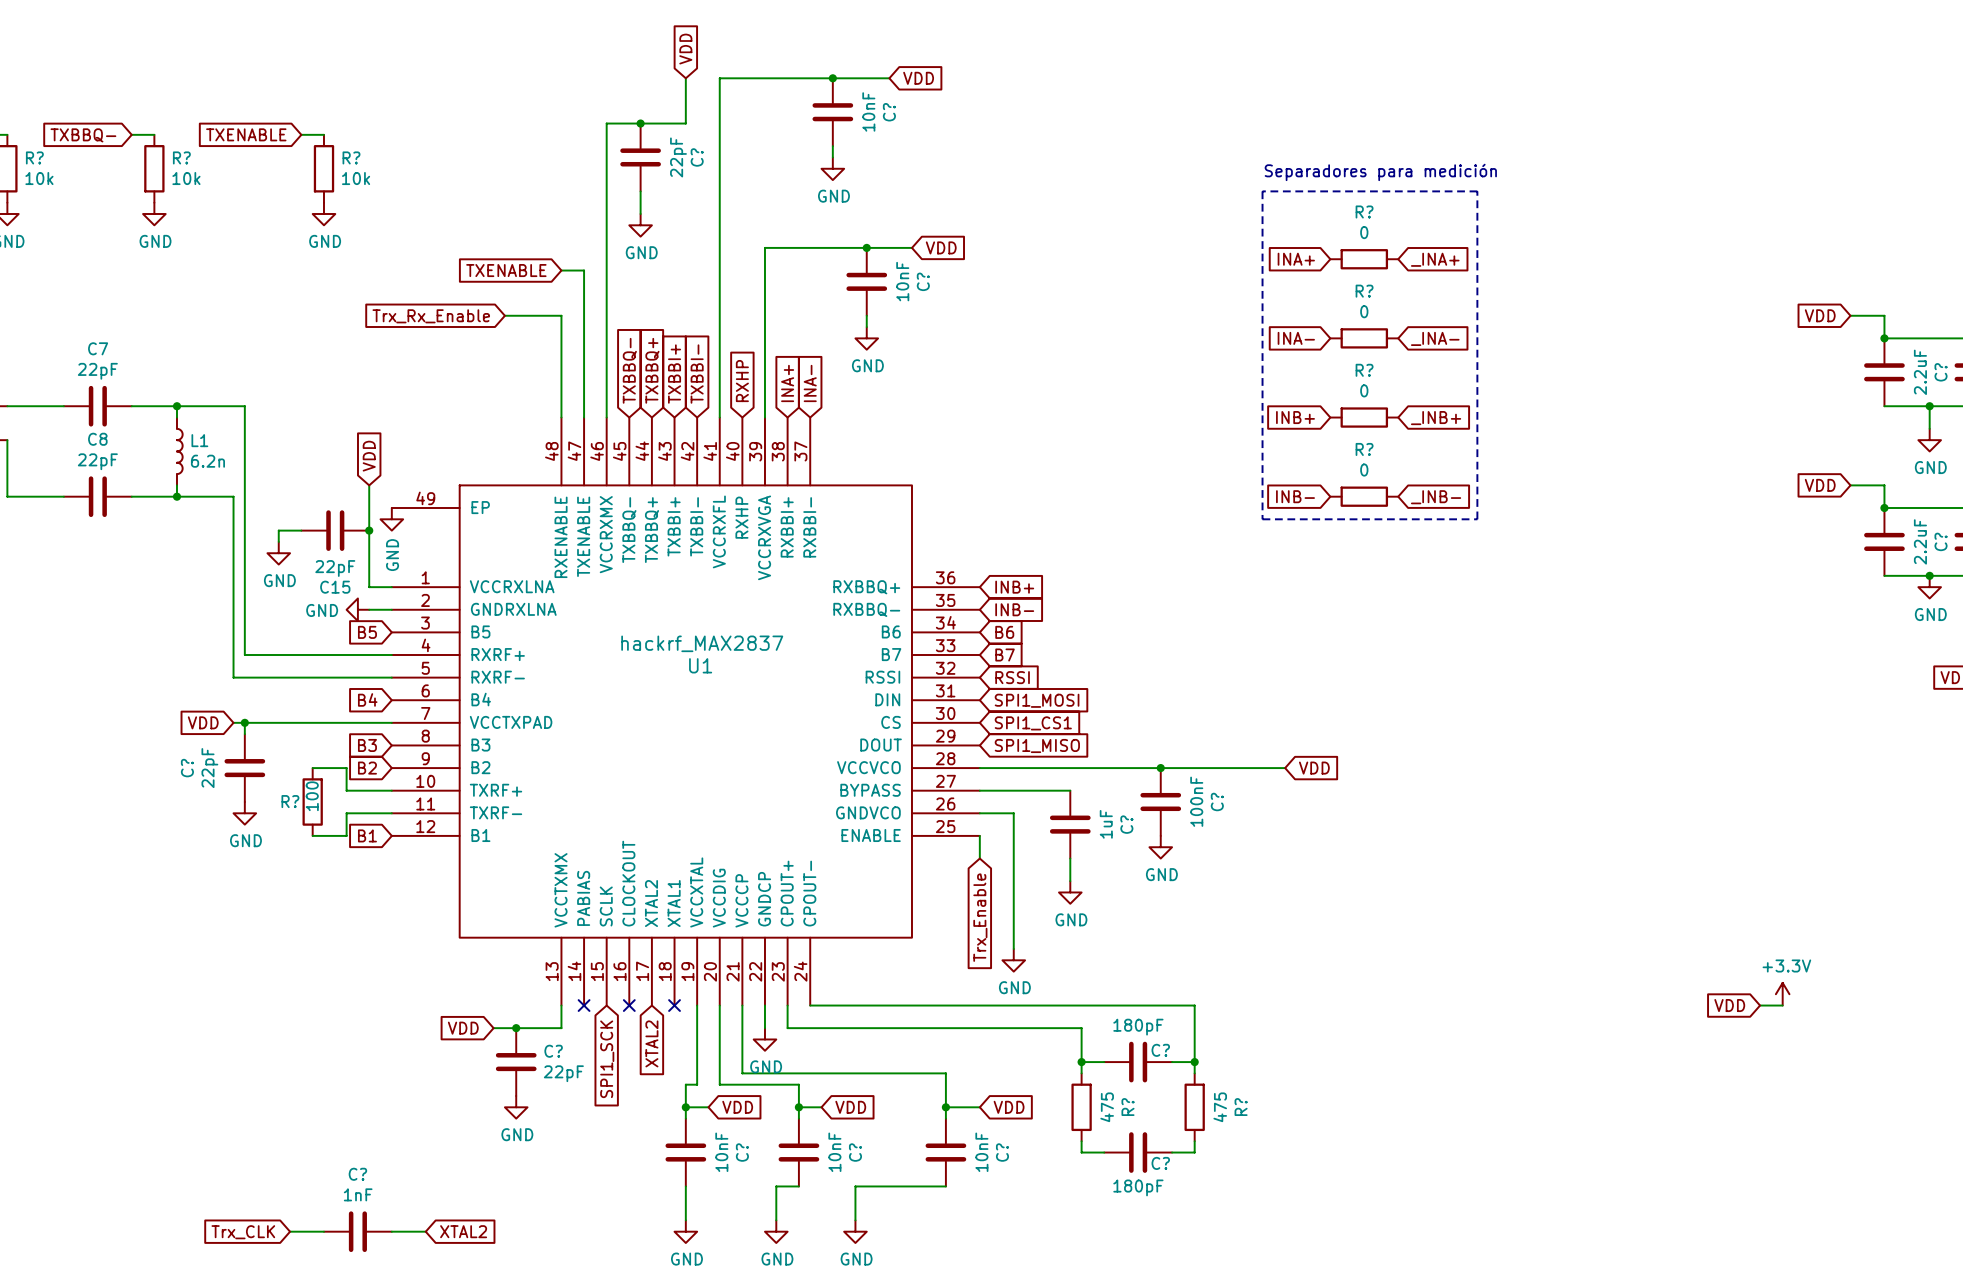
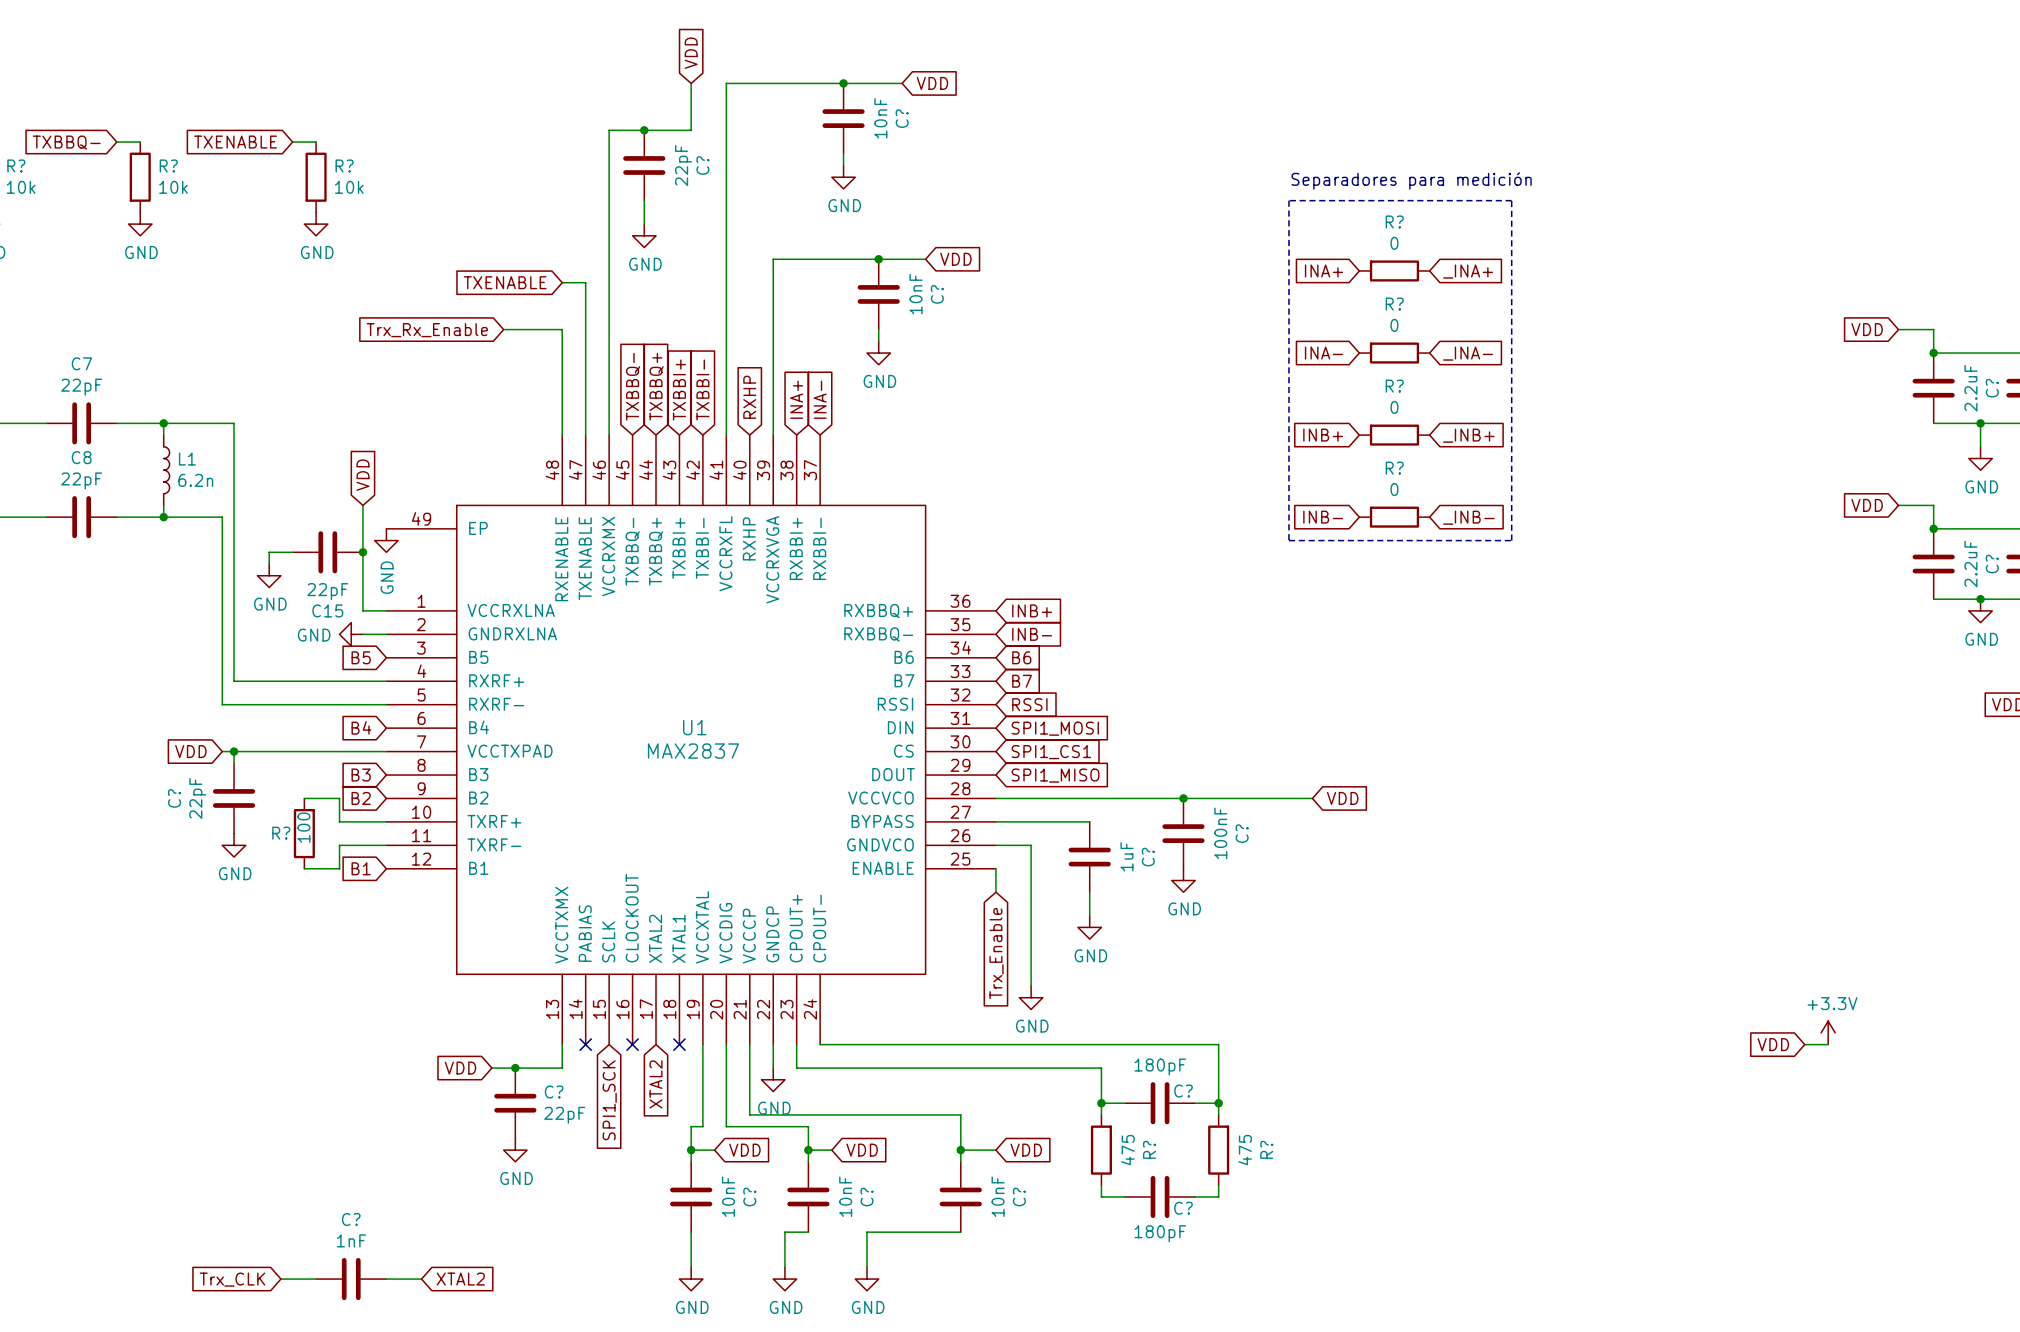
U1 value: hackrf_MAX2837 (702, 643) -> MAX2837 (693, 751)
U1 name position: U1 (700, 665) -> U1 (694, 727)

